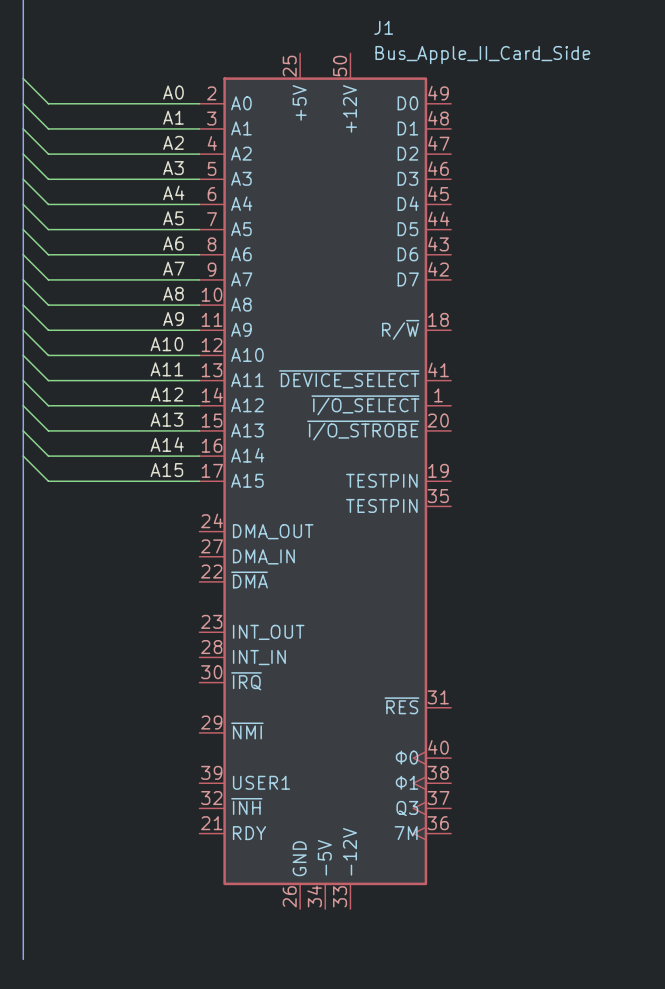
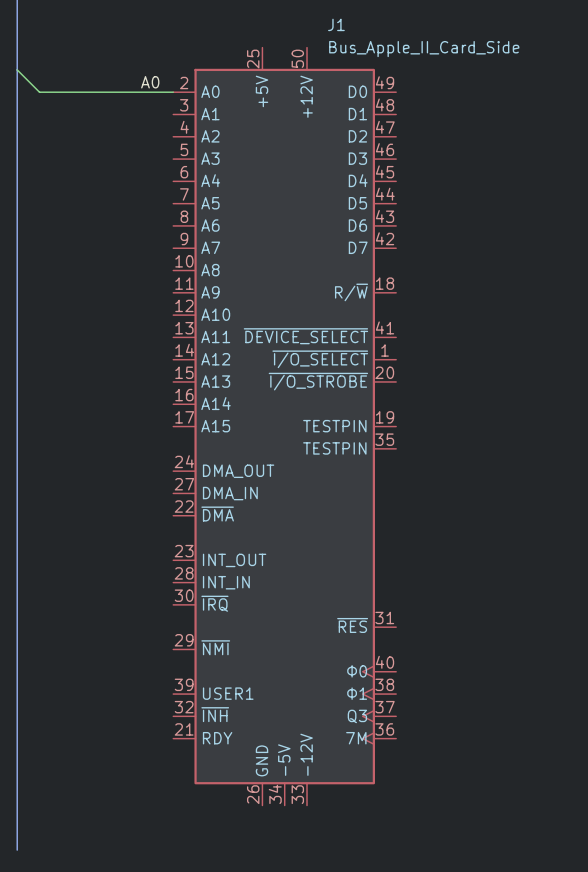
wire: (23, 103) (48, 128) (199, 128) -> none
label: A1 (173, 117) -> none
wire: (23, 128) (48, 154) (199, 154) -> none
label: A2 (173, 142) -> none
wire: (23, 154) (48, 179) (199, 179) -> none
label: A3 (173, 168) -> none
wire: (23, 179) (48, 204) (199, 204) -> none
label: A4 (173, 192) -> none
wire: (23, 204) (48, 229) (199, 229) -> none
label: A5 (173, 218) -> none
wire: (23, 229) (48, 254) (199, 254) -> none
label: A6 (173, 243) -> none
wire: (23, 254) (48, 279) (199, 279) -> none
label: A7 (173, 268) -> none
wire: (23, 279) (48, 305) (199, 305) -> none
label: A8 (173, 293) -> none
wire: (23, 305) (48, 330) (199, 330) -> none
label: A9 (173, 319) -> none
wire: (23, 330) (48, 355) (199, 355) -> none
label: A10 (166, 344) -> none
wire: (23, 355) (48, 380) (199, 380) -> none
label: A11 (166, 369) -> none
wire: (23, 380) (48, 405) (199, 405) -> none
label: A12 (166, 394) -> none
wire: (23, 405) (48, 430) (199, 430) -> none
label: A13 (166, 419) -> none
wire: (23, 430) (48, 456) (199, 456) -> none
label: A14 (167, 444) -> none
wire: (23, 456) (48, 481) (199, 481) -> none
label: A15 (166, 470) -> none

